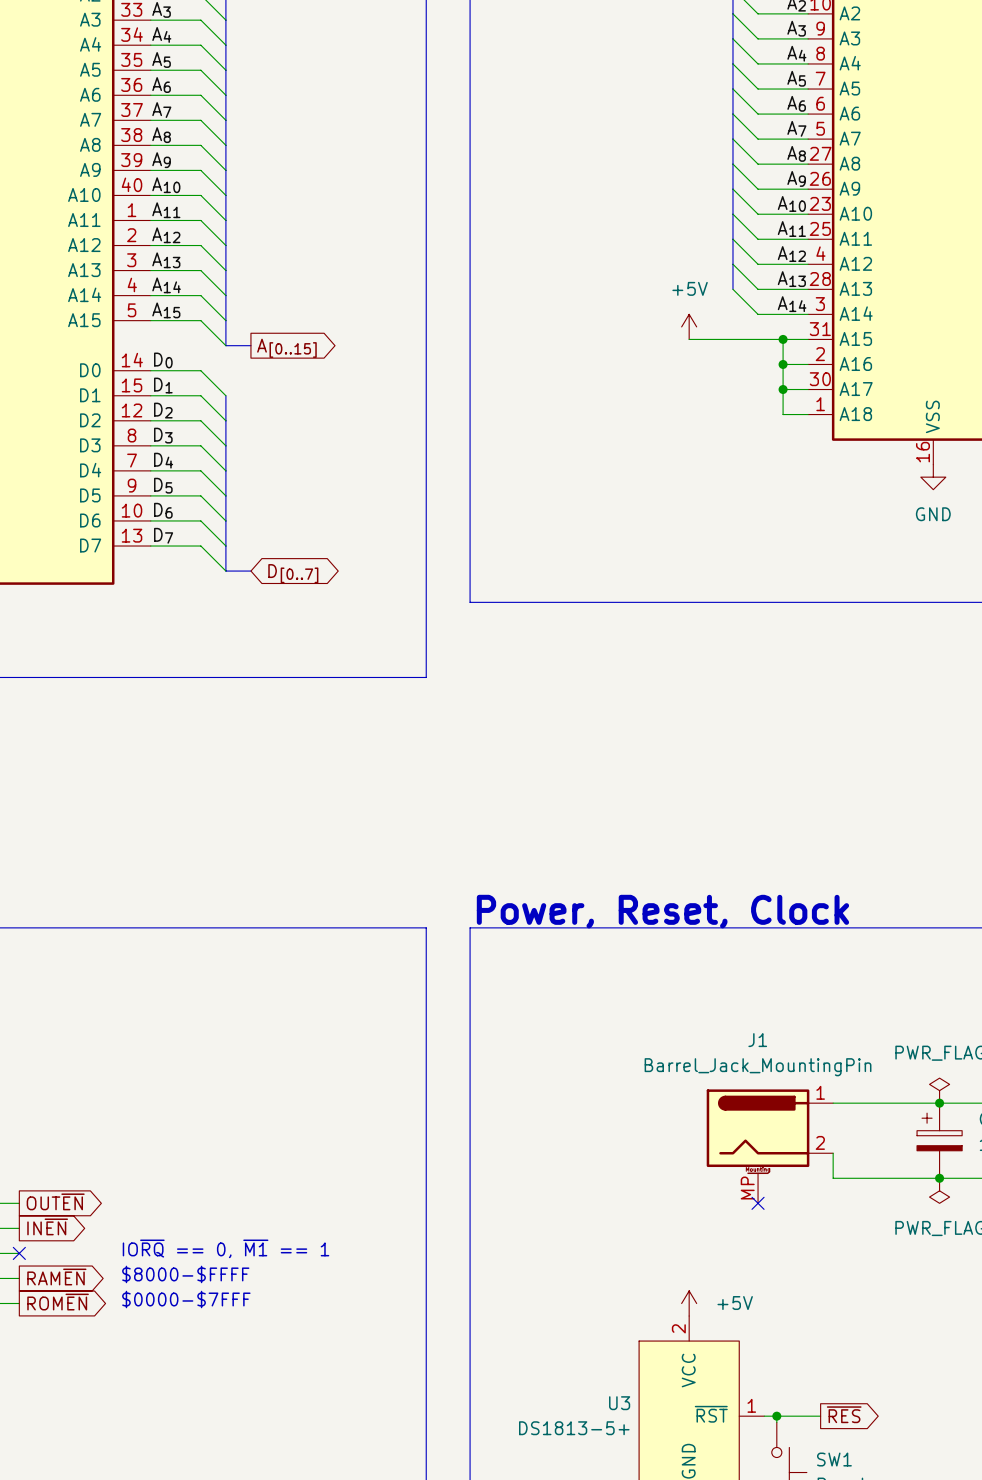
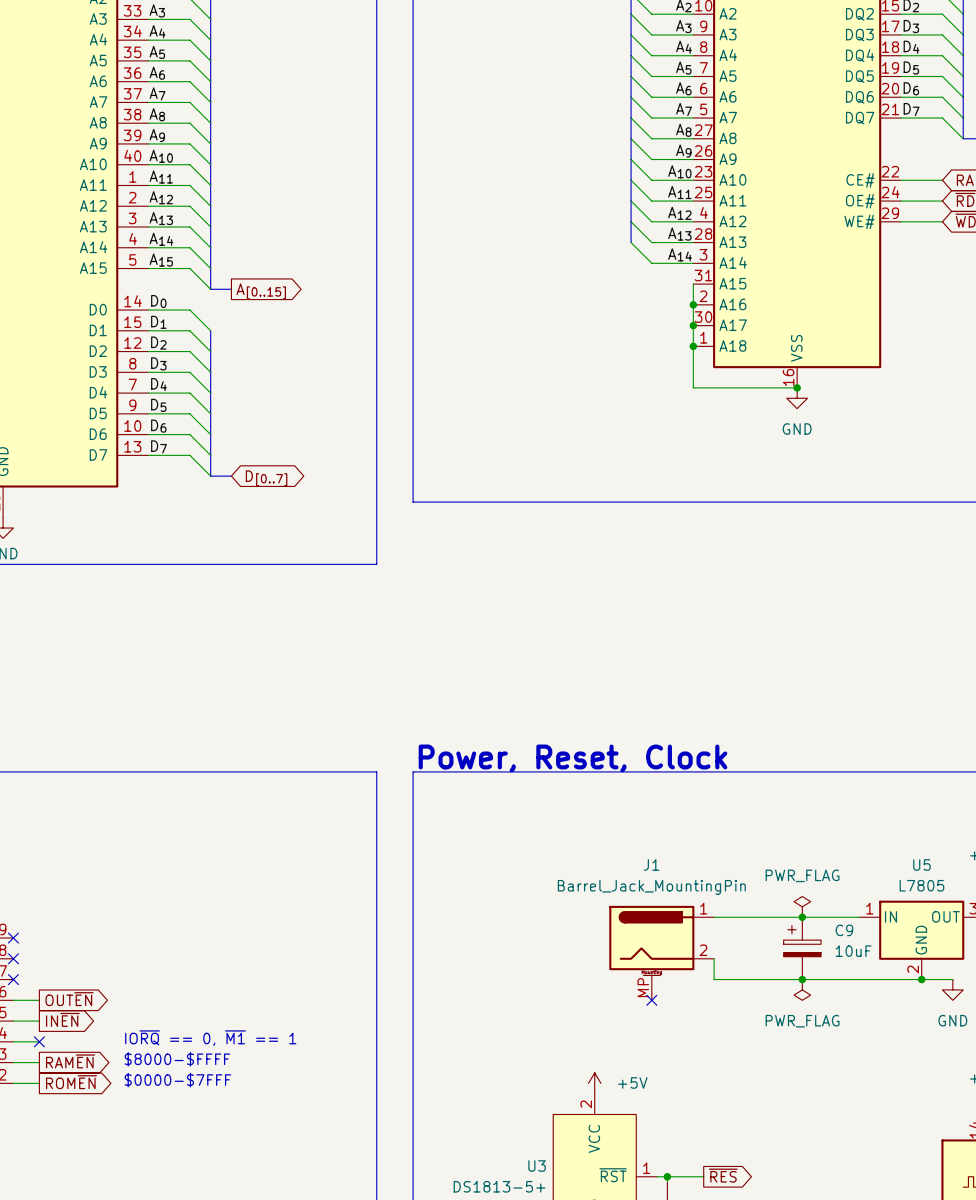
power symbol: +5V (689, 326) -> none
wire: (689, 339) (808, 339) -> (797, 387) (693, 387) (693, 284)
wire: (783, 339) (783, 414) (808, 414) -> none
junction: (783, 339) -> none
wire: (783, 364) (808, 364) -> none
junction: (783, 364) -> none
junction: none -> (693, 304)
wire: (783, 389) (808, 389) -> none
junction: (783, 389) -> none
junction: none -> (693, 325)
junction: none -> (693, 346)
junction: none -> (797, 387)

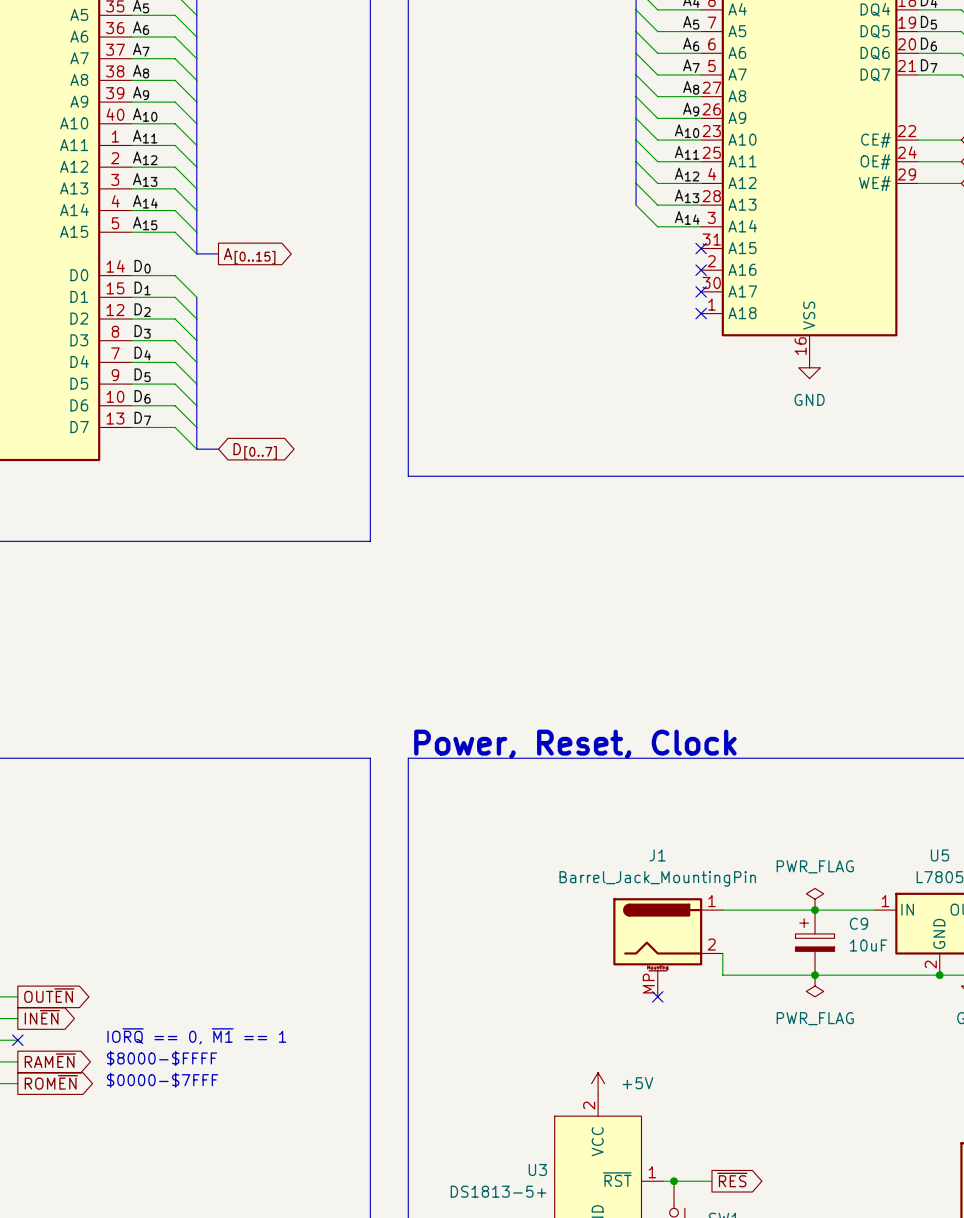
wire: (693, 284) (693, 387) (797, 387) -> none
no-connect mark: none -> (701, 248)
junction: (693, 304) -> none
no-connect mark: none -> (701, 270)
junction: (693, 325) -> none
no-connect mark: none -> (701, 291)
junction: (693, 346) -> none
no-connect mark: none -> (701, 313)
junction: (797, 387) -> none

